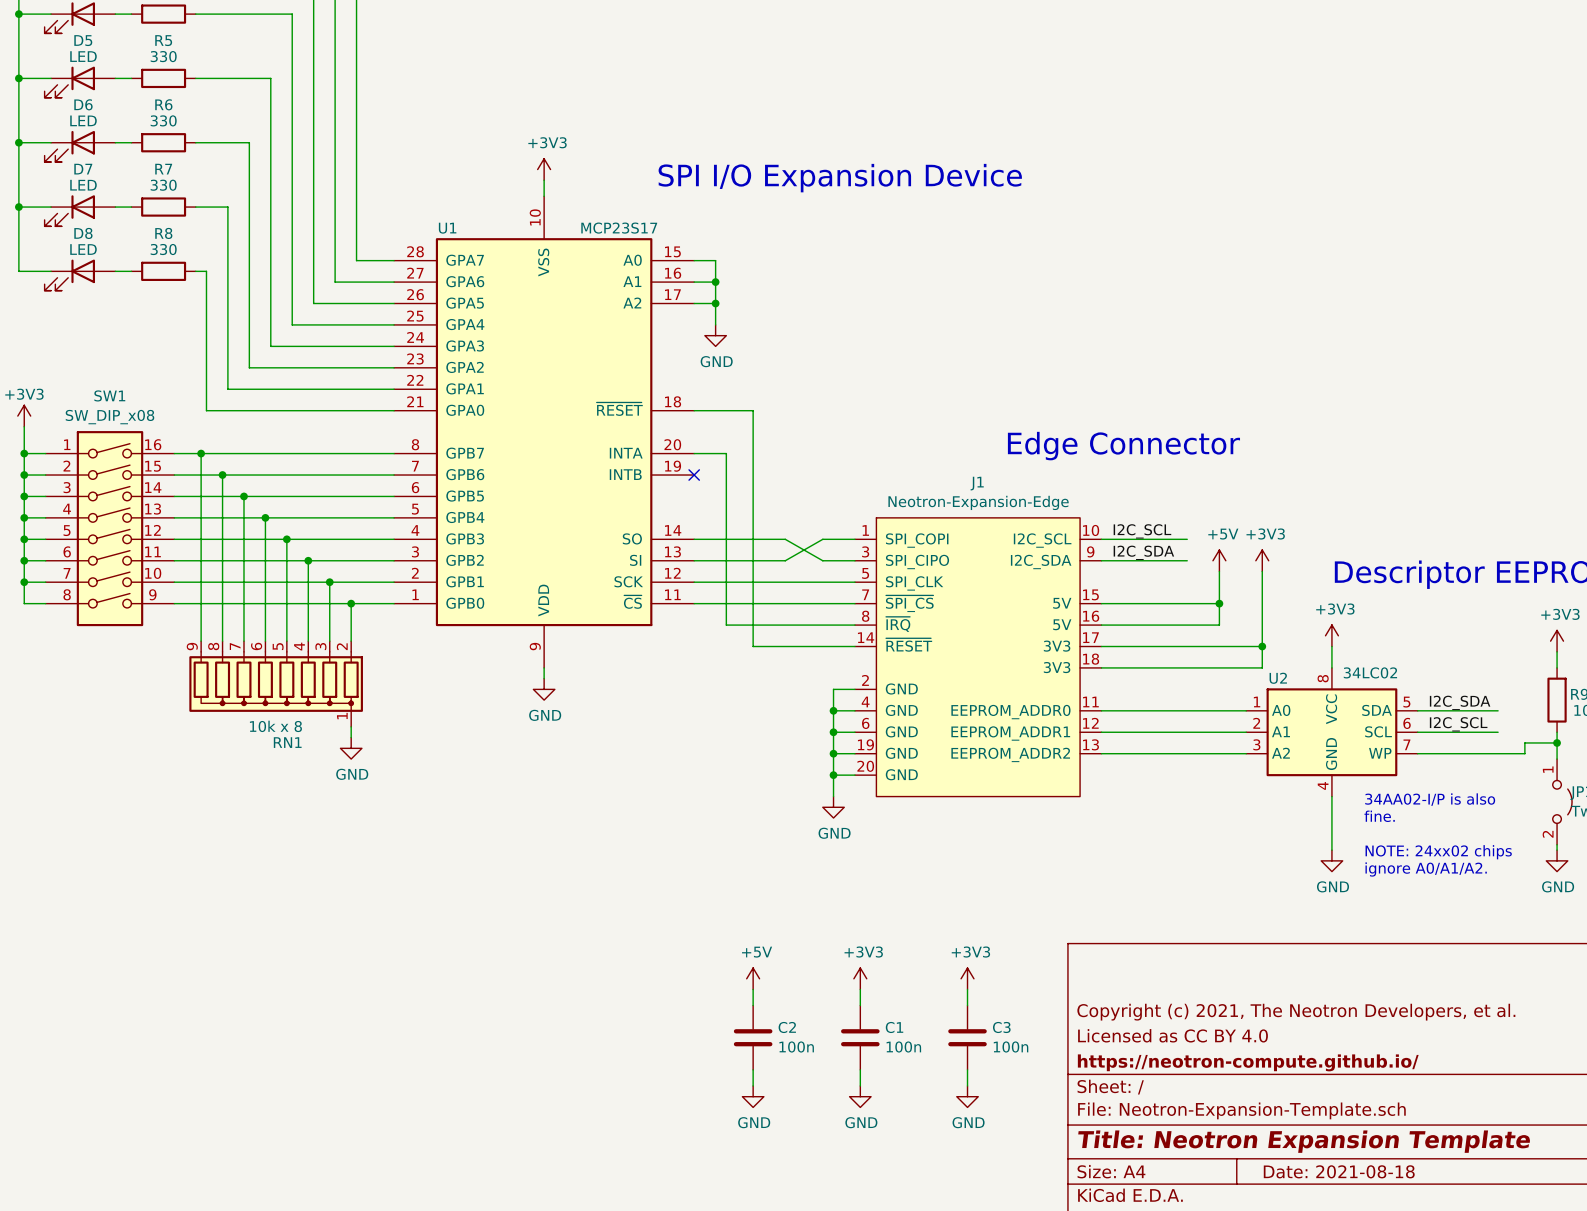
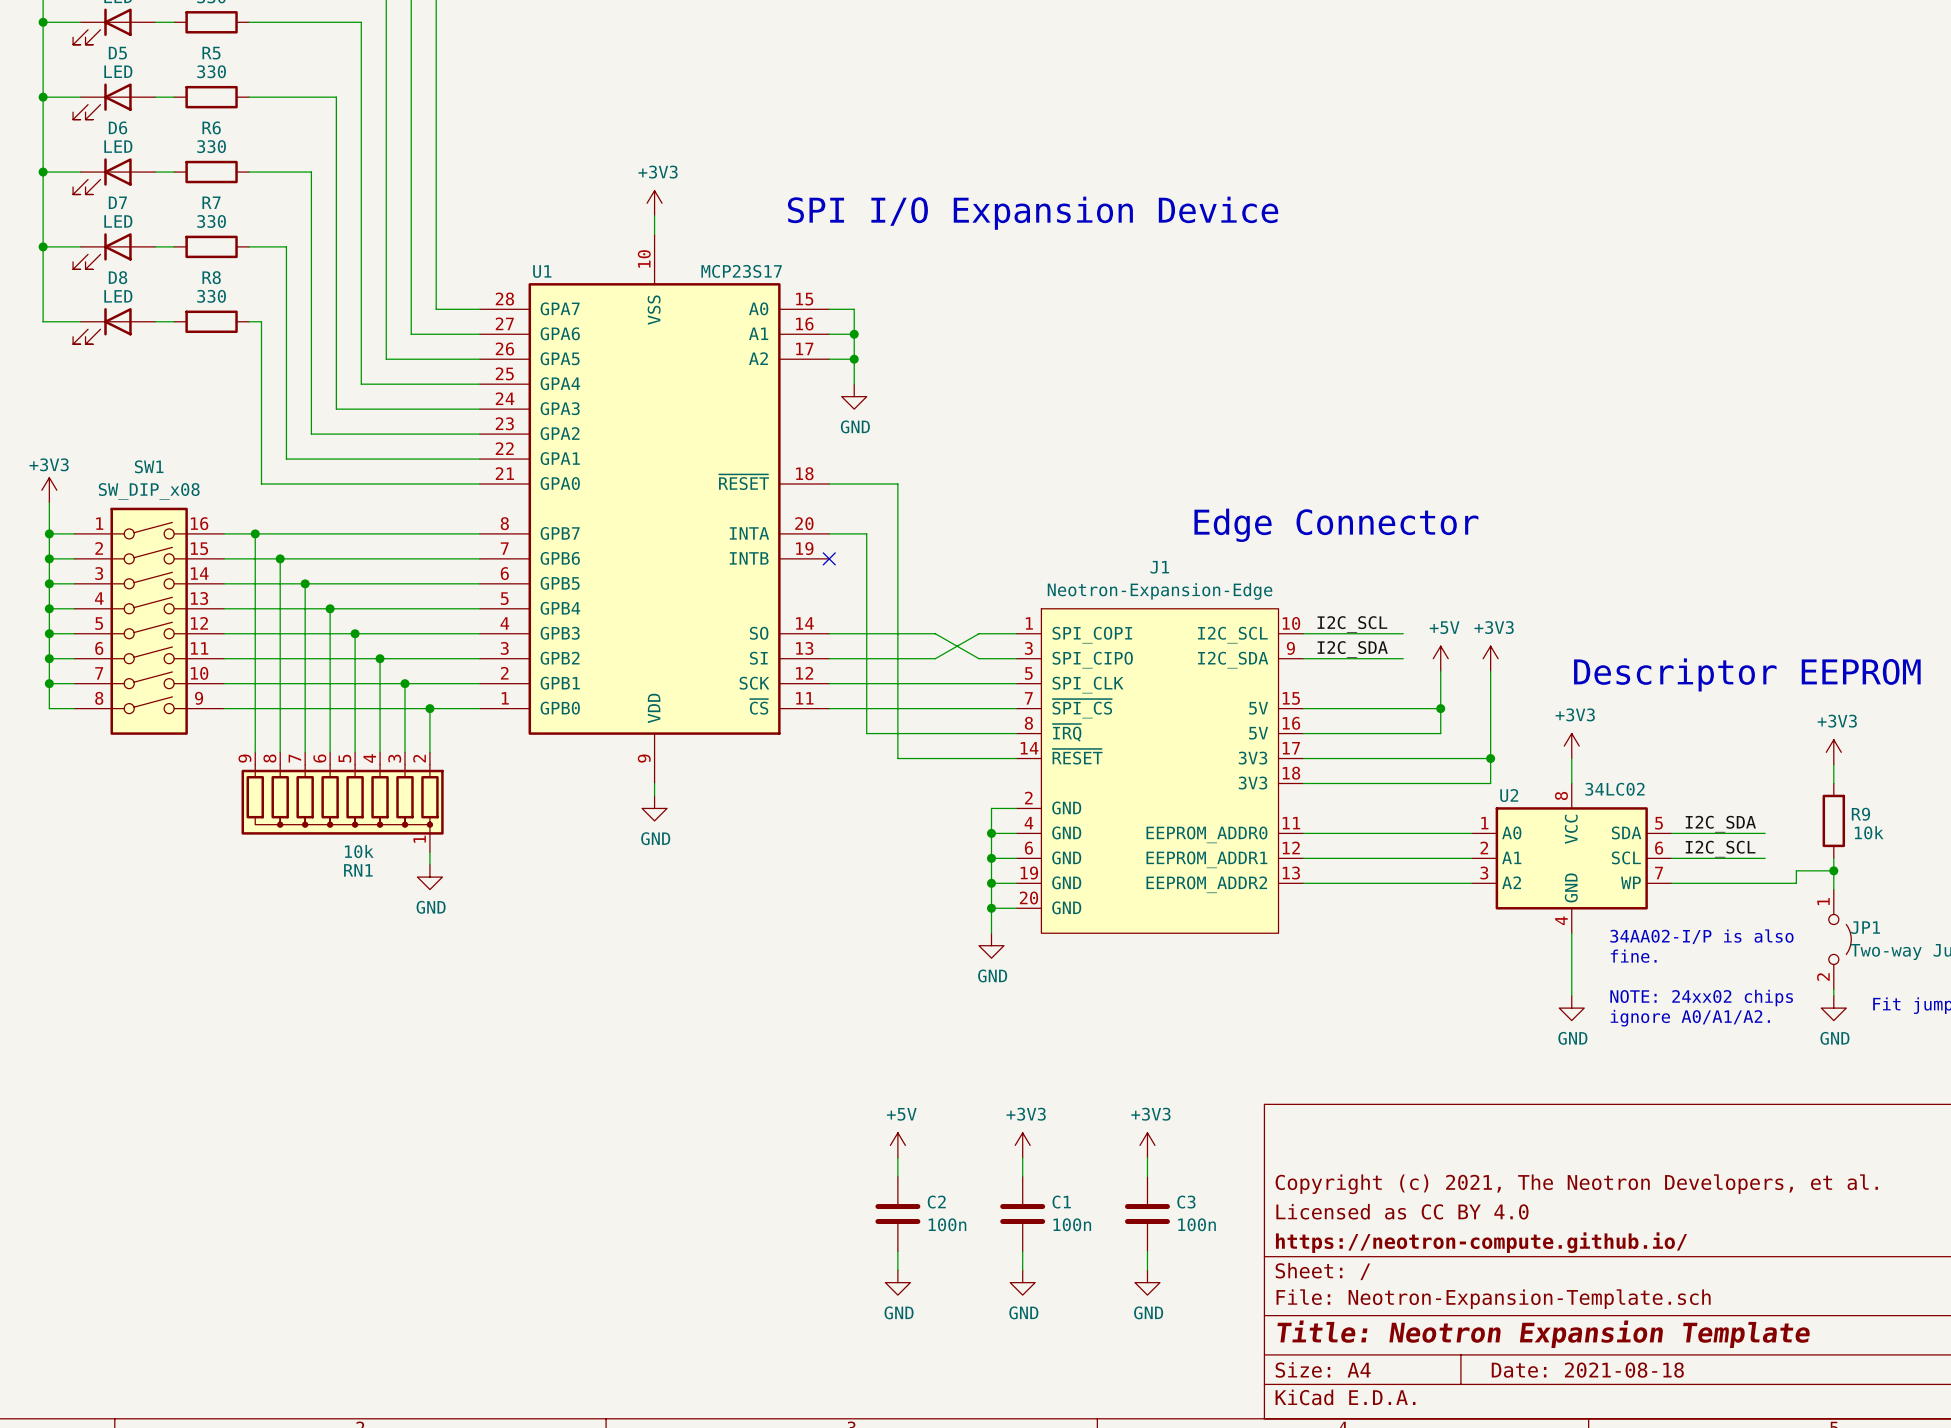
RN1 value: 10k x 8 (275, 726) -> 10k (359, 851)

